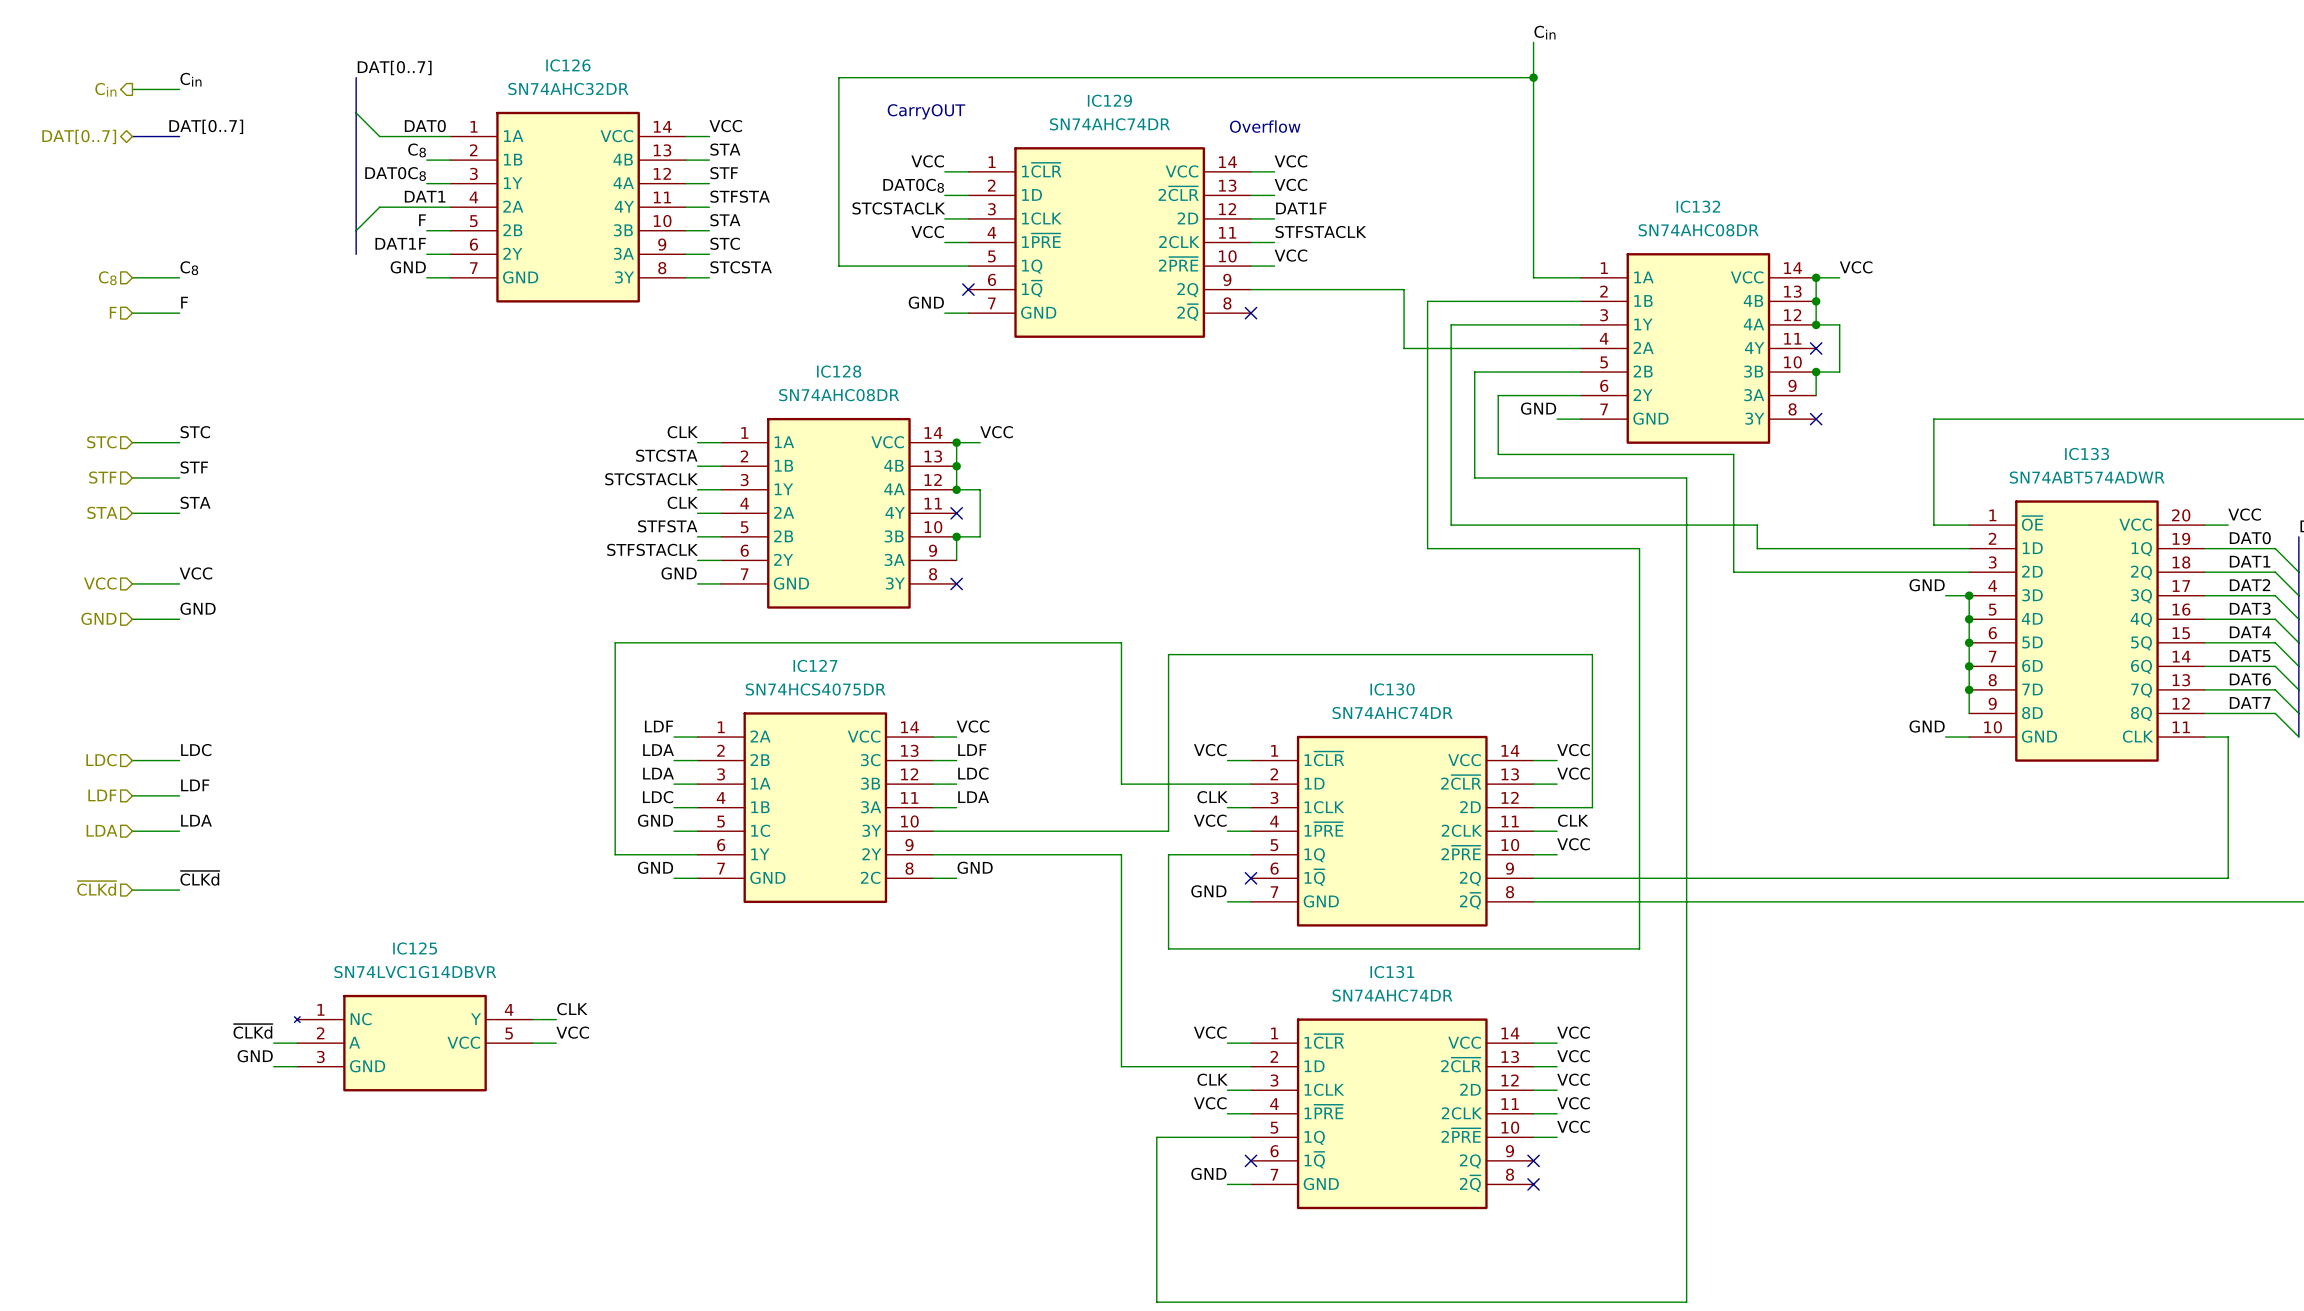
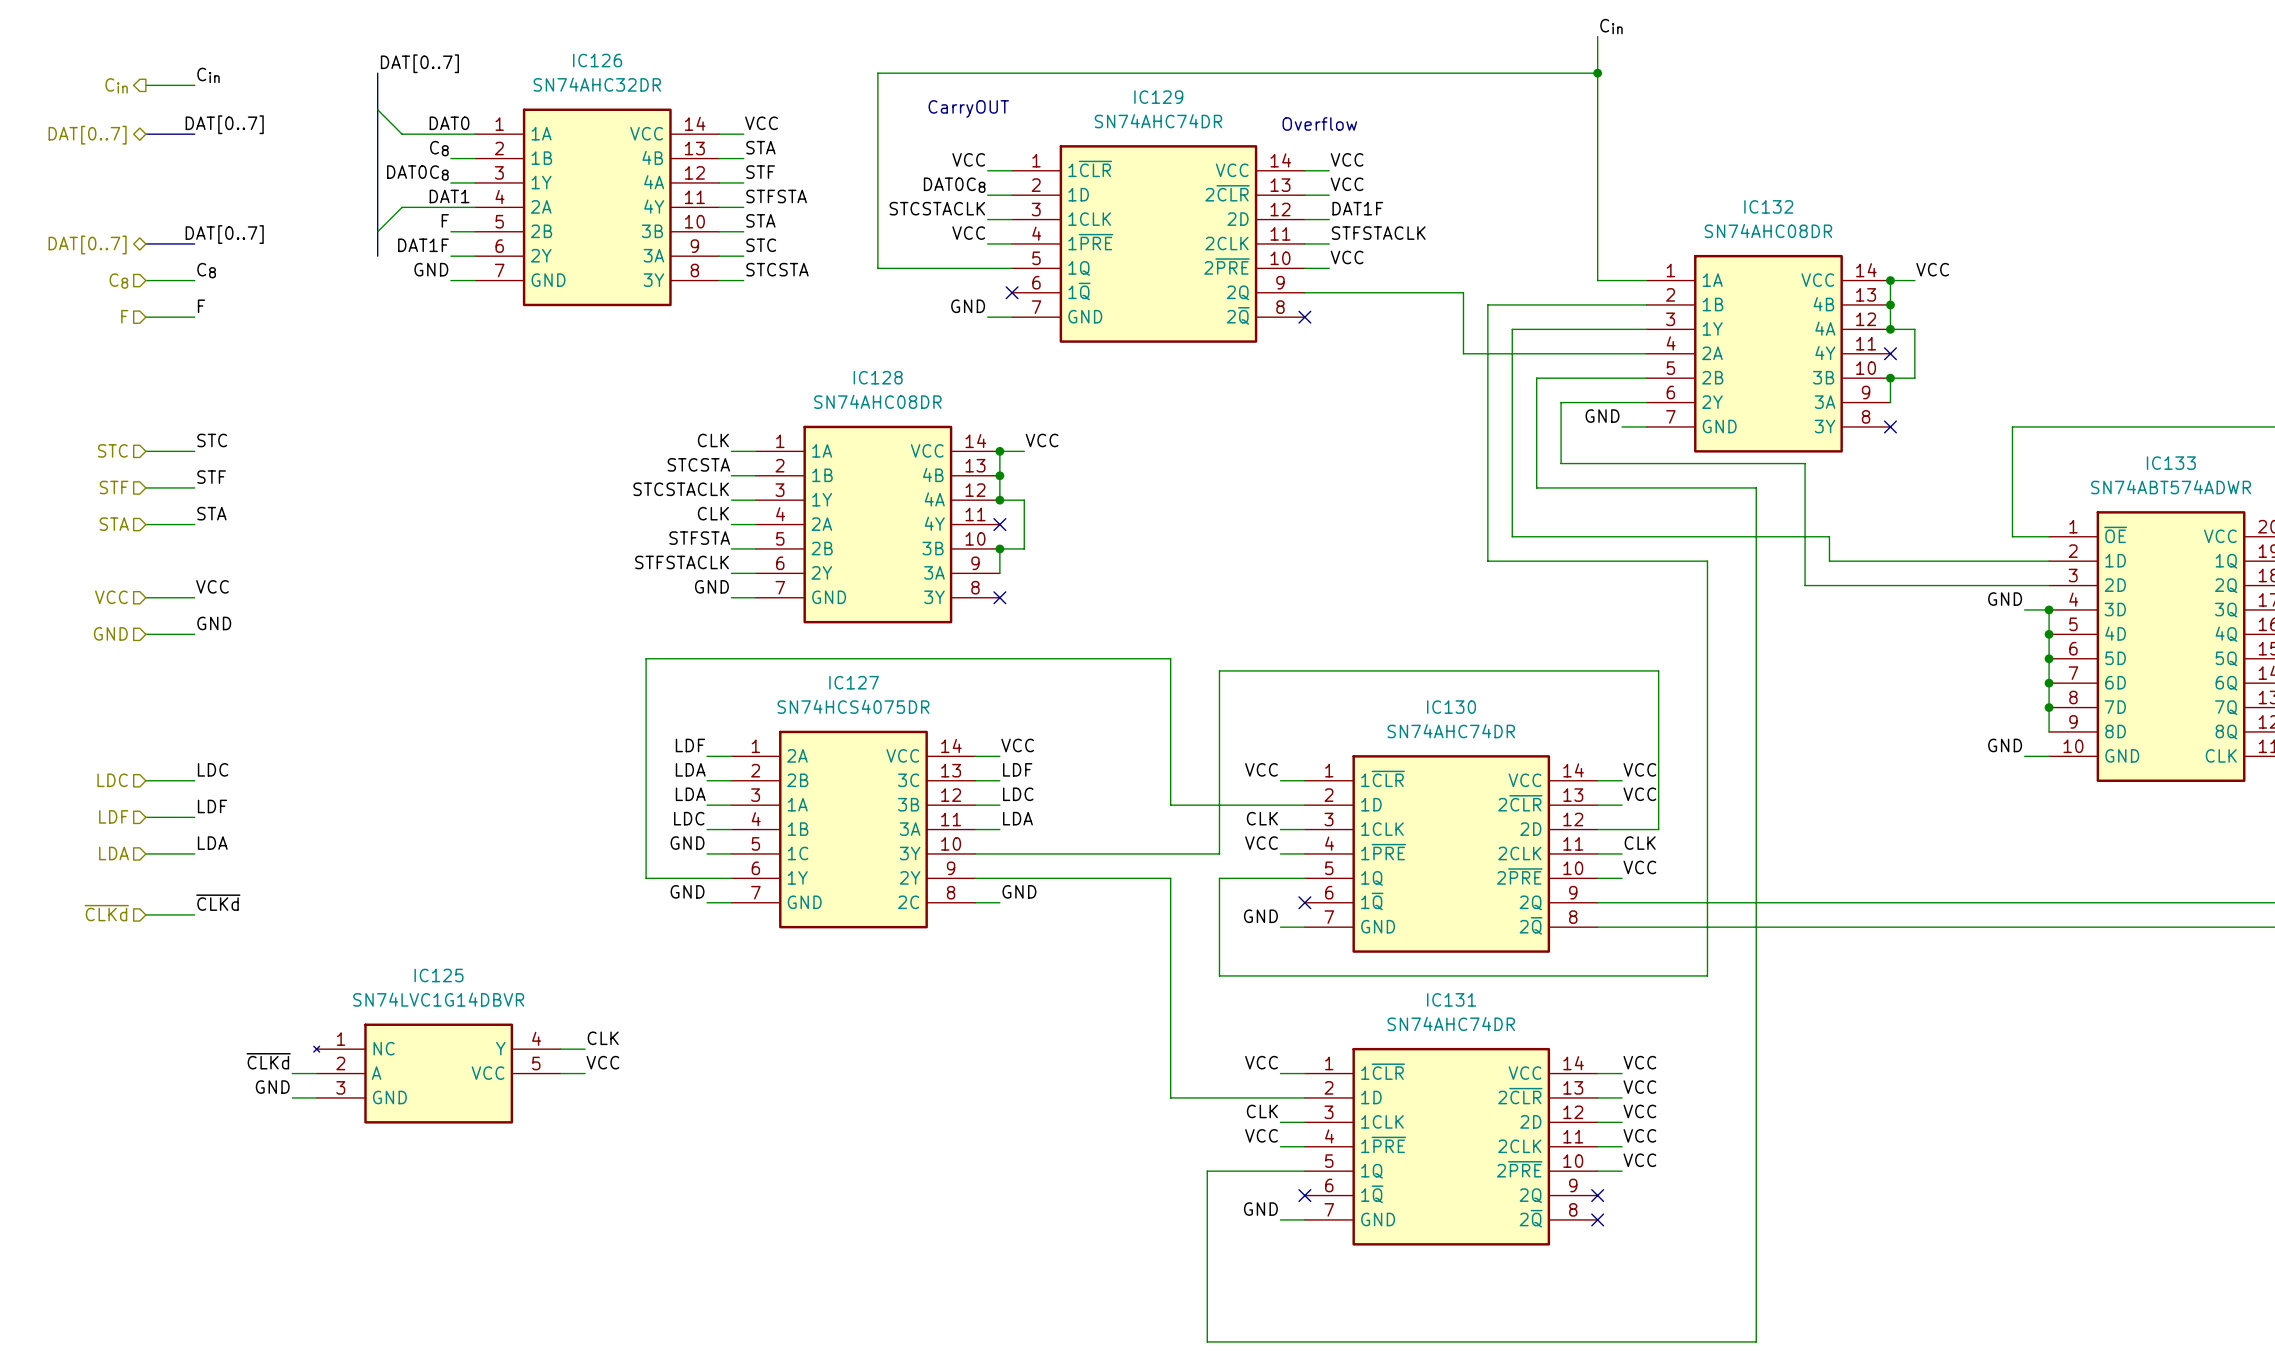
label: none -> DAT[0..7] (224, 234)
hierarchical label: none -> DAT[0..7] (87, 244)
bus: none -> (145, 243) (194, 243)

